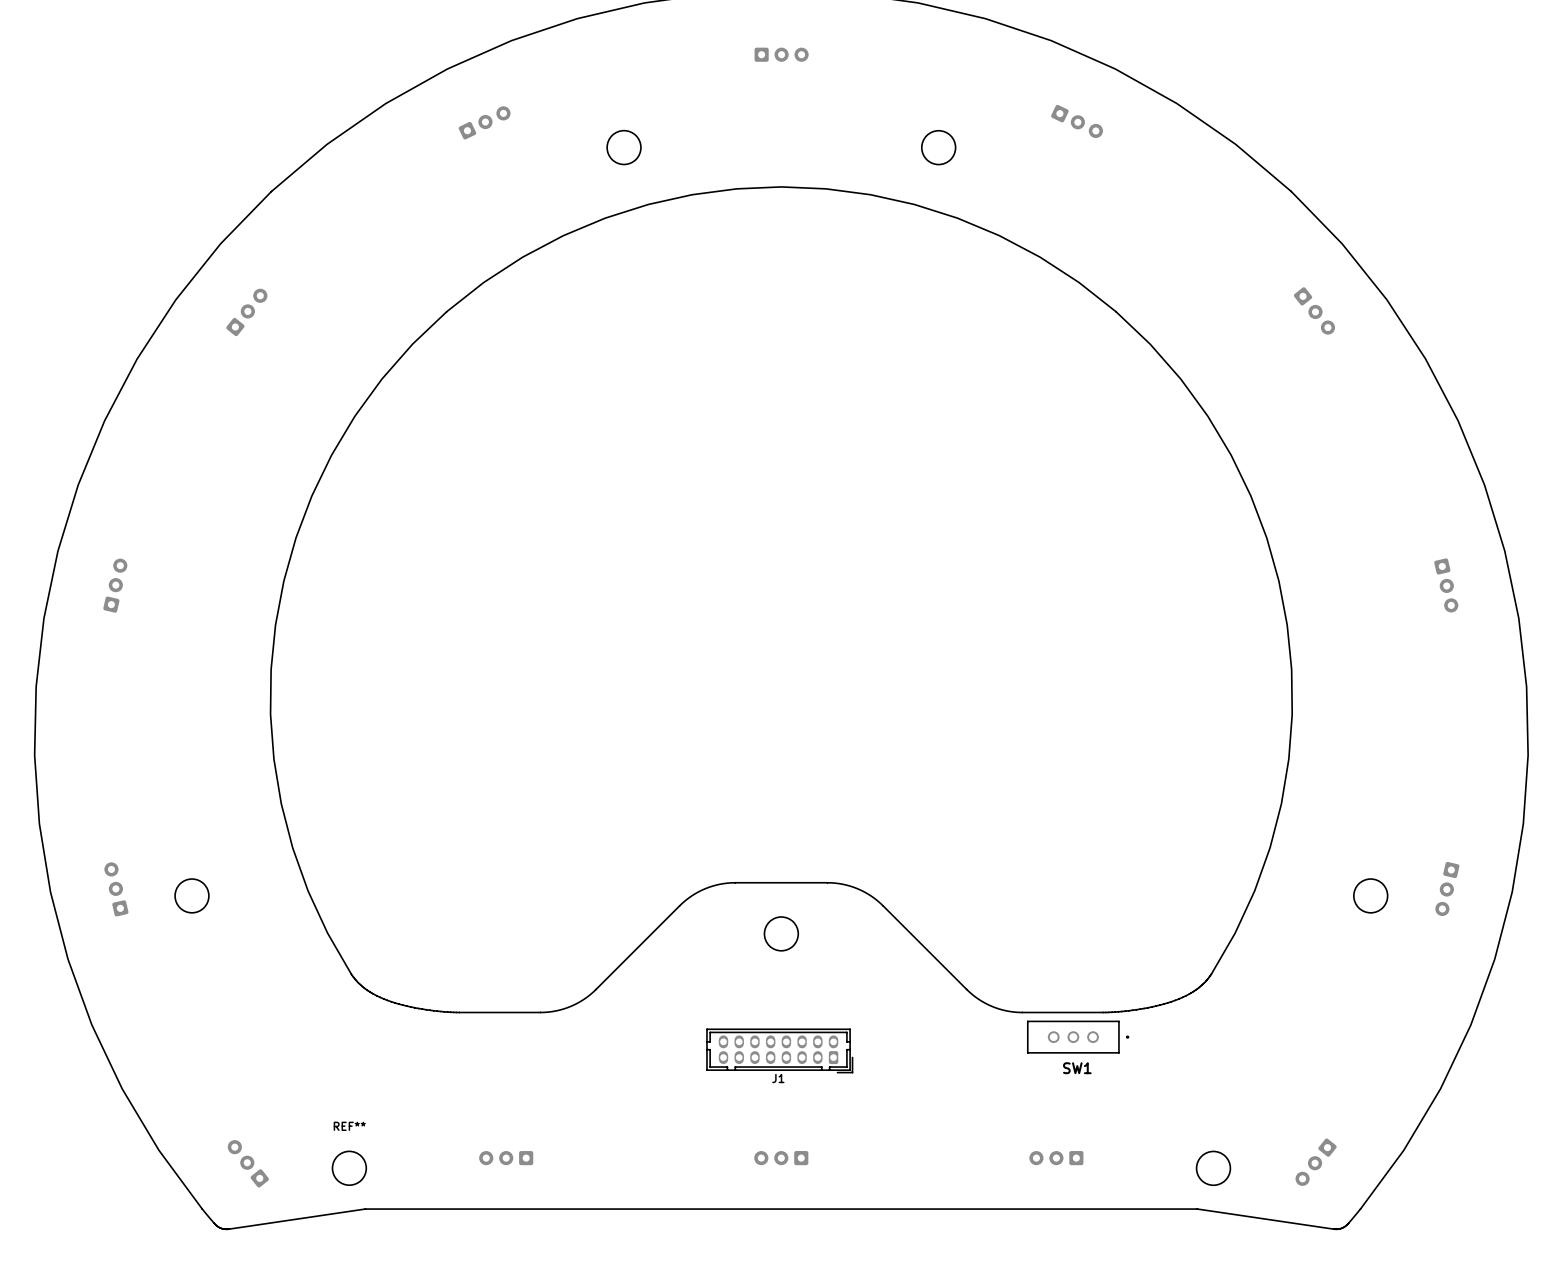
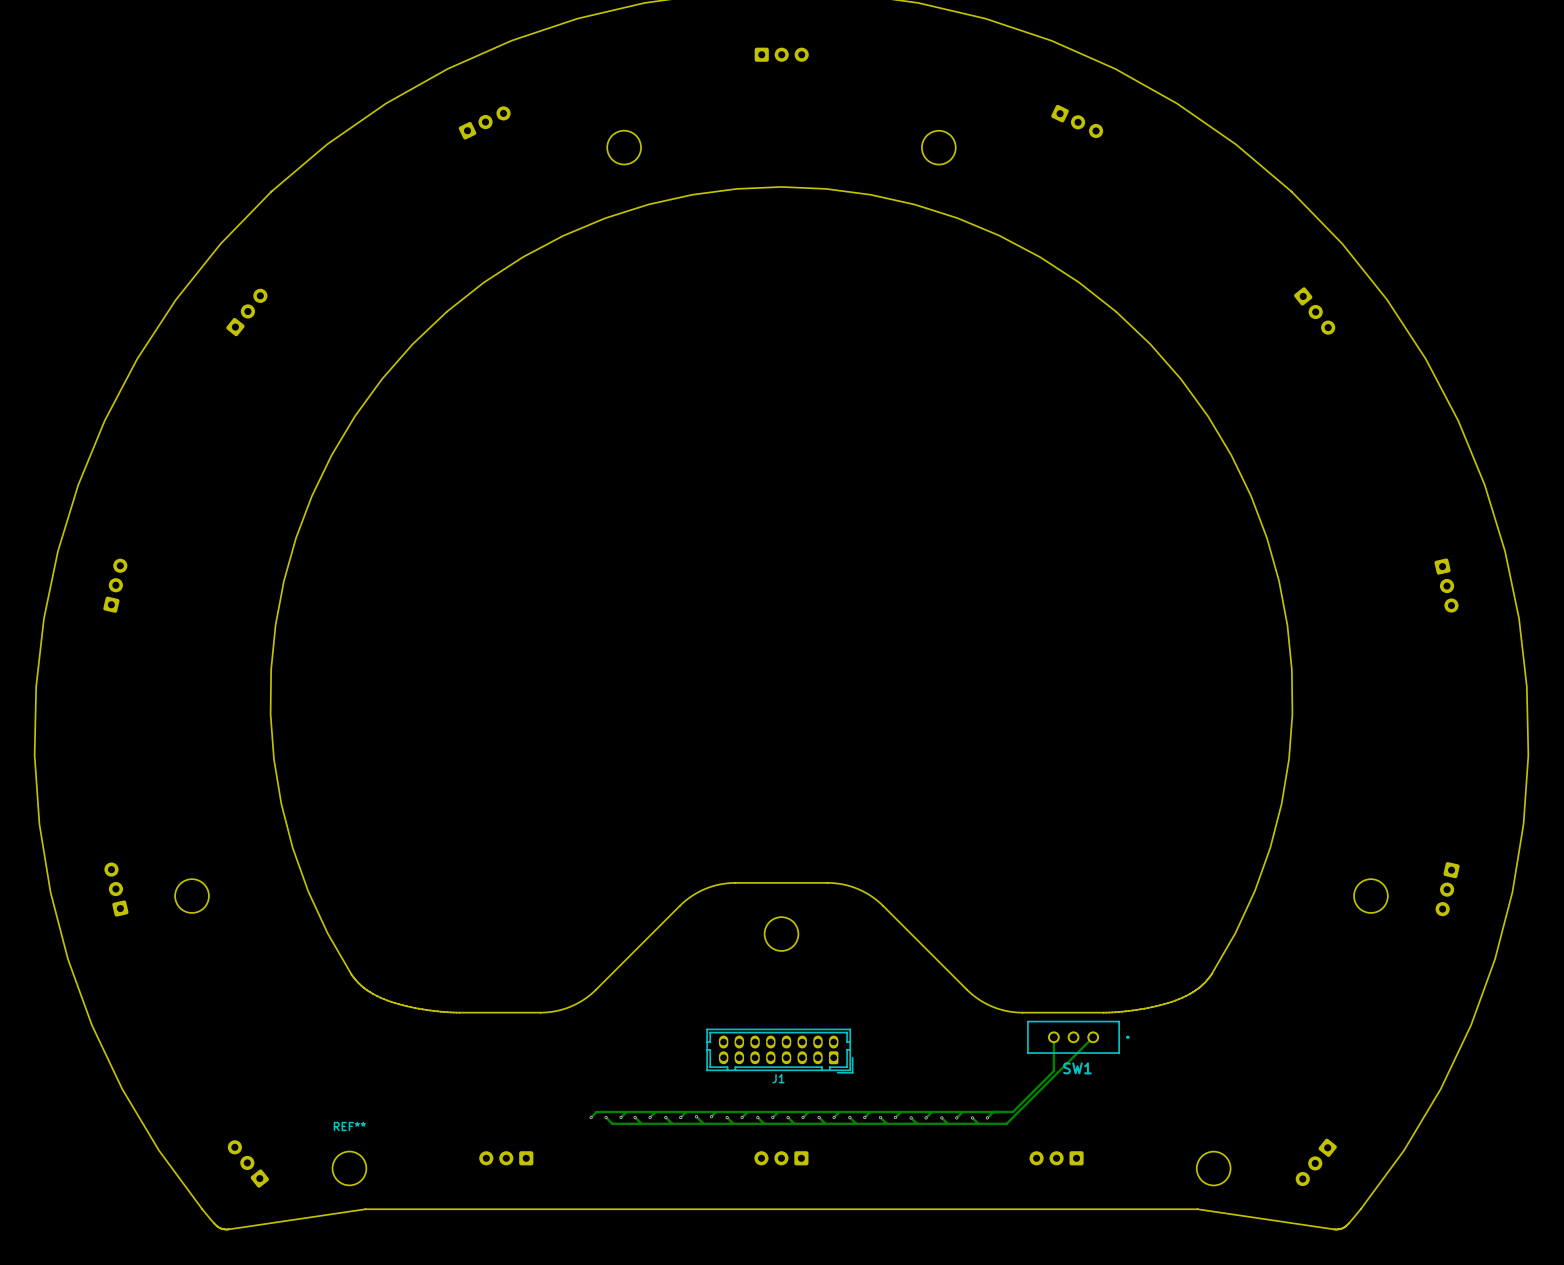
track: none -> (1053, 1037) (1053, 1071) (1012, 1112) (596, 1112) (591, 1117)
track: none -> (1093, 1037) (1006, 1123) (612, 1123) (606, 1117)
track: none -> (626, 1112) (620, 1117)
track: none -> (655, 1112) (650, 1117)
track: none -> (686, 1112) (680, 1117)
track: none -> (716, 1112) (711, 1116)
track: none -> (747, 1112) (742, 1117)
track: none -> (778, 1112) (772, 1117)
track: none -> (808, 1112) (803, 1117)
track: none -> (839, 1112) (834, 1117)
track: none -> (870, 1112) (864, 1117)
track: none -> (900, 1112) (895, 1117)
track: none -> (931, 1112) (926, 1117)
track: none -> (962, 1112) (956, 1117)
track: none -> (993, 1112) (987, 1117)
track: none -> (696, 1116) (703, 1123)
via: none -> (696, 1116)
via: none -> (711, 1116)
via: none -> (591, 1117)
via: none -> (606, 1117)
via: none -> (620, 1117)
track: none -> (635, 1117) (641, 1123)
via: none -> (635, 1117)
via: none -> (650, 1117)
track: none -> (665, 1117) (672, 1123)
via: none -> (665, 1117)
via: none -> (680, 1117)
track: none -> (727, 1117) (733, 1123)
via: none -> (727, 1117)
via: none -> (742, 1117)
track: none -> (757, 1117) (764, 1123)
via: none -> (757, 1117)
via: none -> (772, 1117)
track: none -> (788, 1117) (794, 1123)
via: none -> (788, 1117)
via: none -> (803, 1117)
track: none -> (819, 1117) (825, 1123)
via: none -> (819, 1117)
via: none -> (834, 1117)
track: none -> (849, 1117) (856, 1123)
via: none -> (849, 1117)
via: none -> (864, 1117)
track: none -> (880, 1117) (886, 1123)
via: none -> (880, 1117)
via: none -> (895, 1117)
track: none -> (911, 1117) (917, 1123)
via: none -> (911, 1117)
via: none -> (926, 1117)
track: none -> (941, 1117) (947, 1123)
via: none -> (941, 1117)
via: none -> (956, 1117)
track: none -> (972, 1117) (978, 1123)
via: none -> (972, 1117)
via: none -> (987, 1117)

